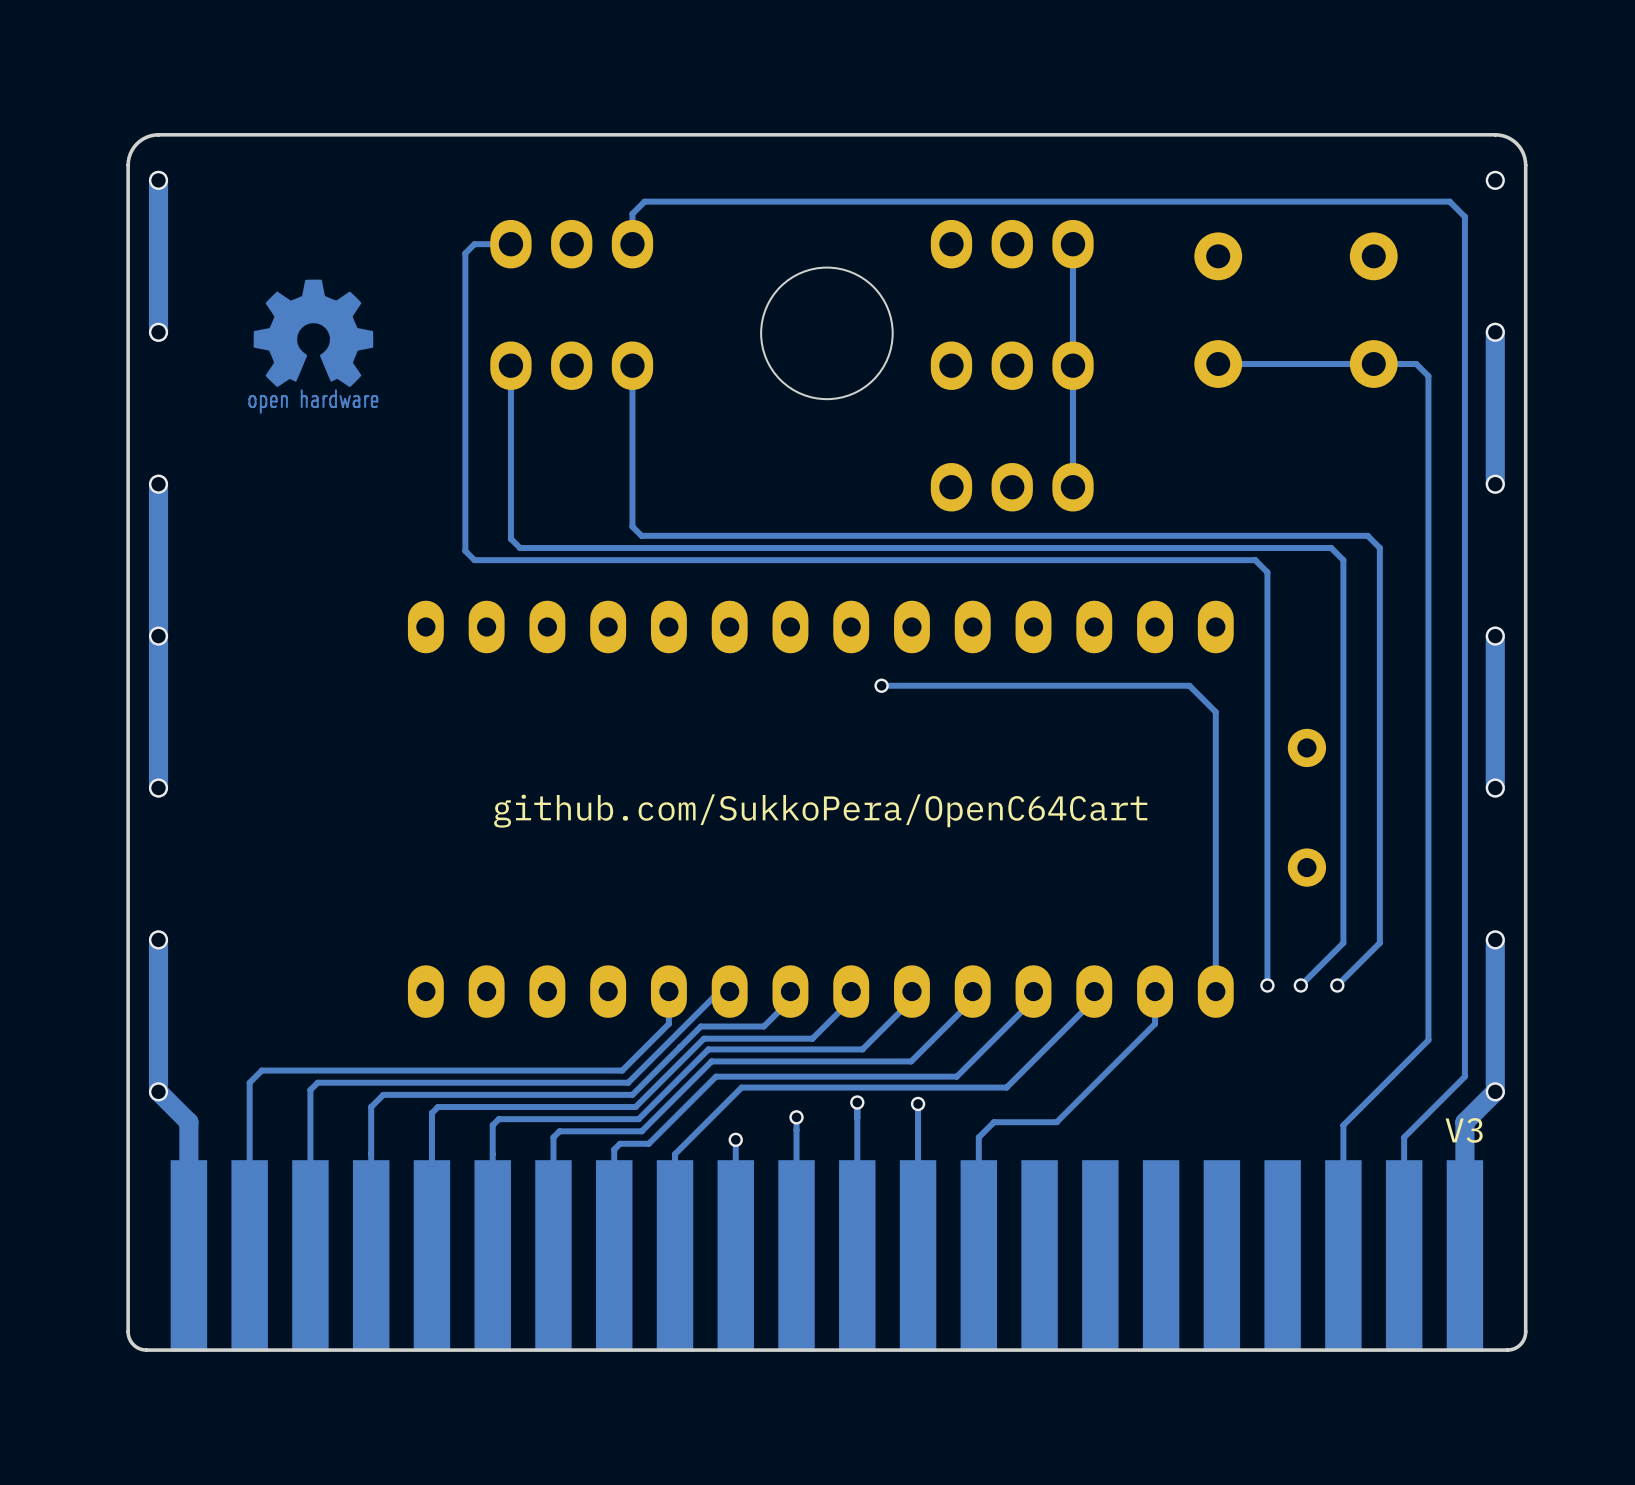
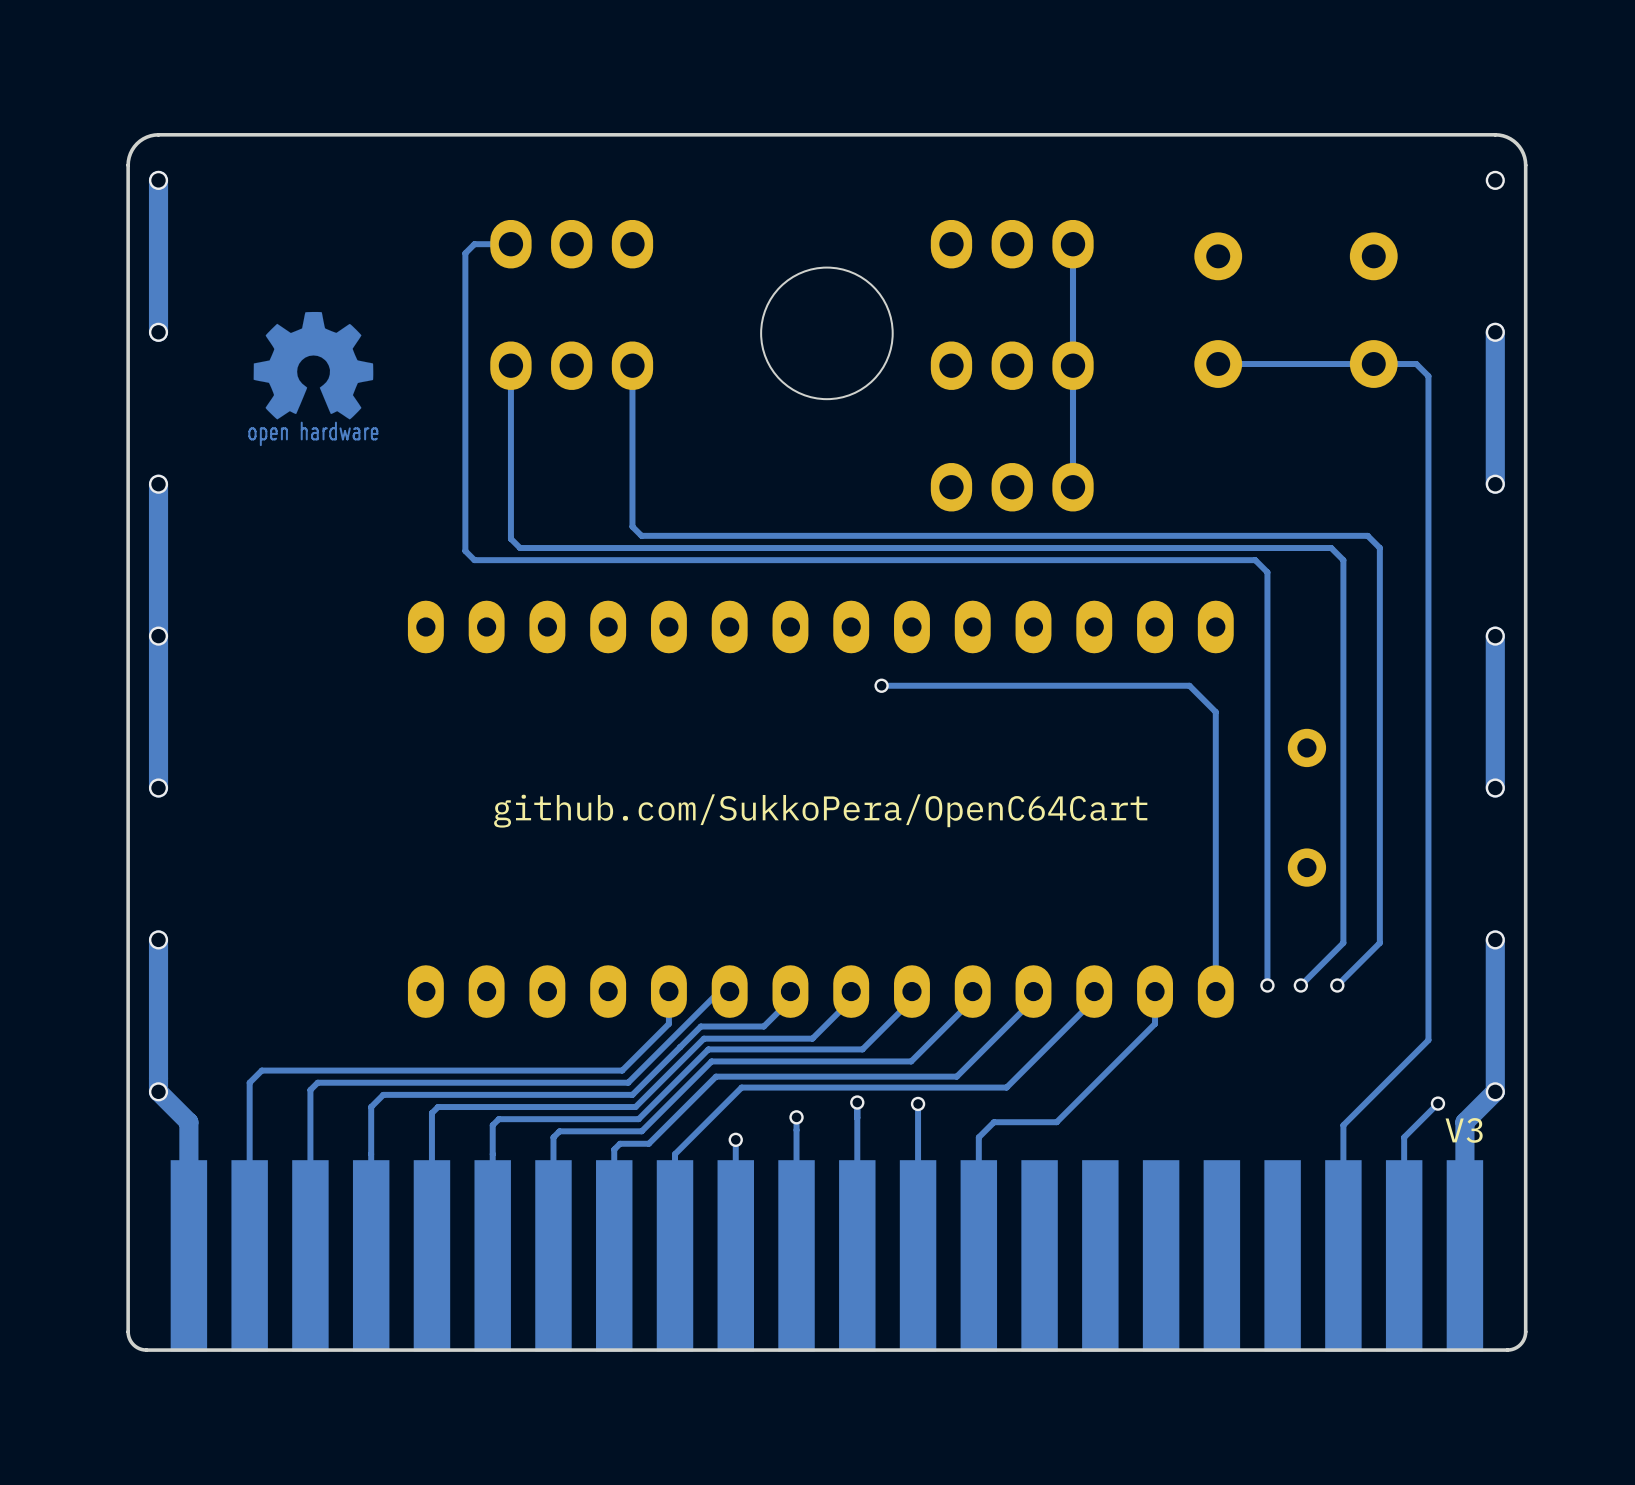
track: (632, 244) (632, 213) (644, 201) (1449, 201) (1464, 216) (1464, 1076) (1437, 1103) -> none
drawing position: (313, 346) -> (313, 379)
via: none -> (1437, 1103)

